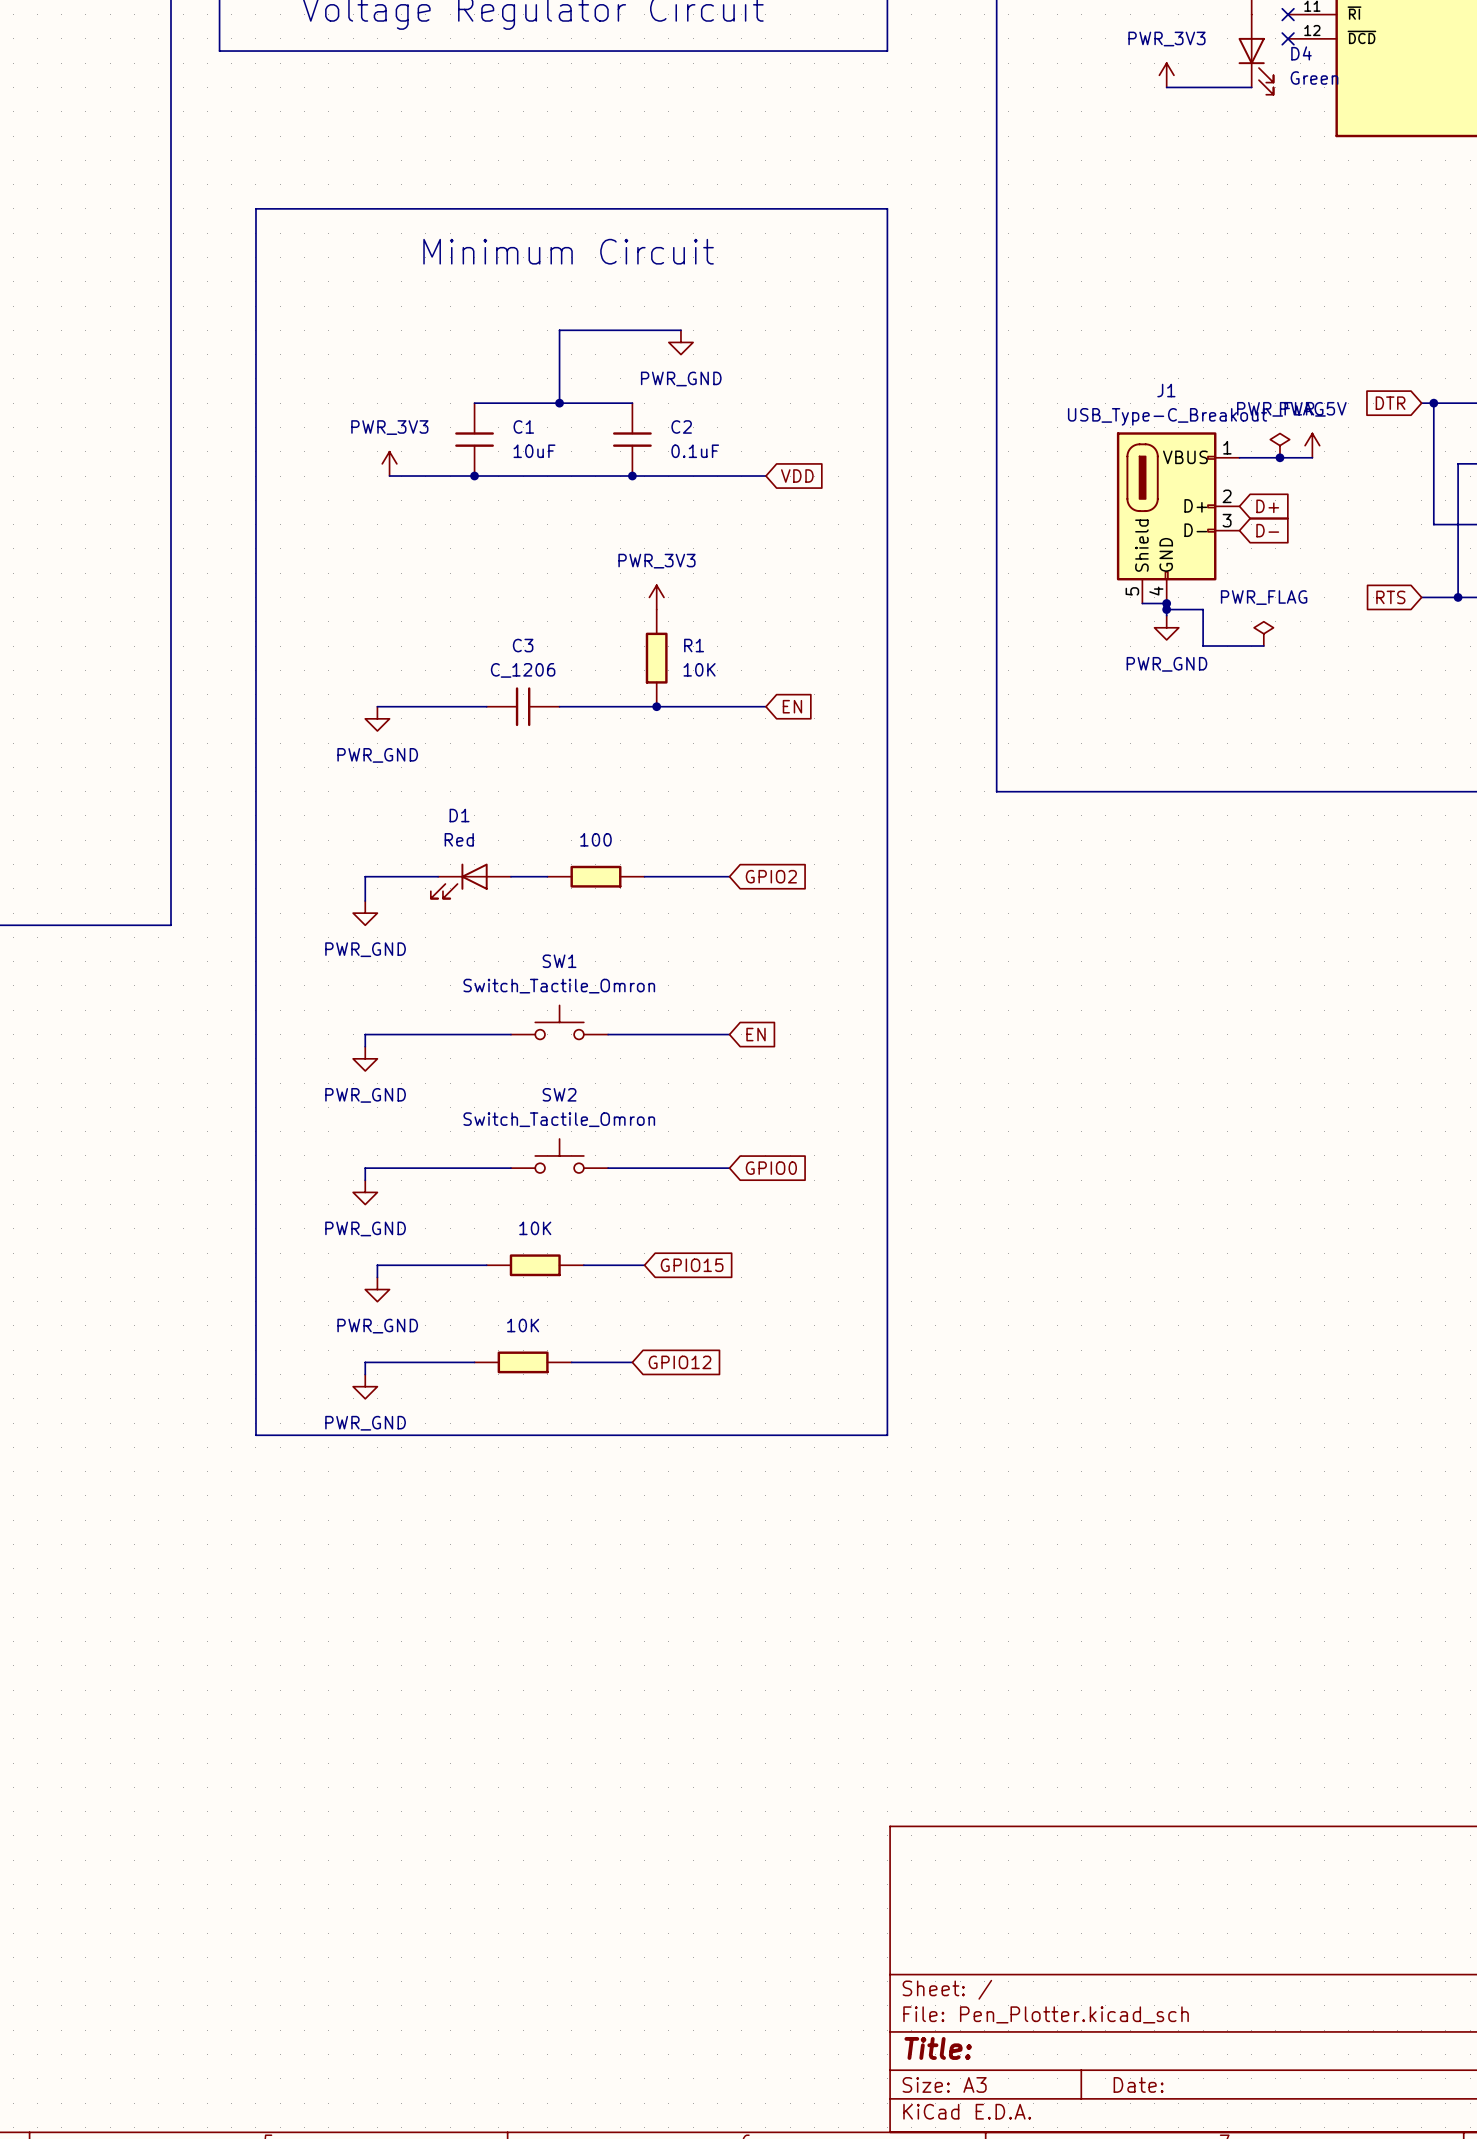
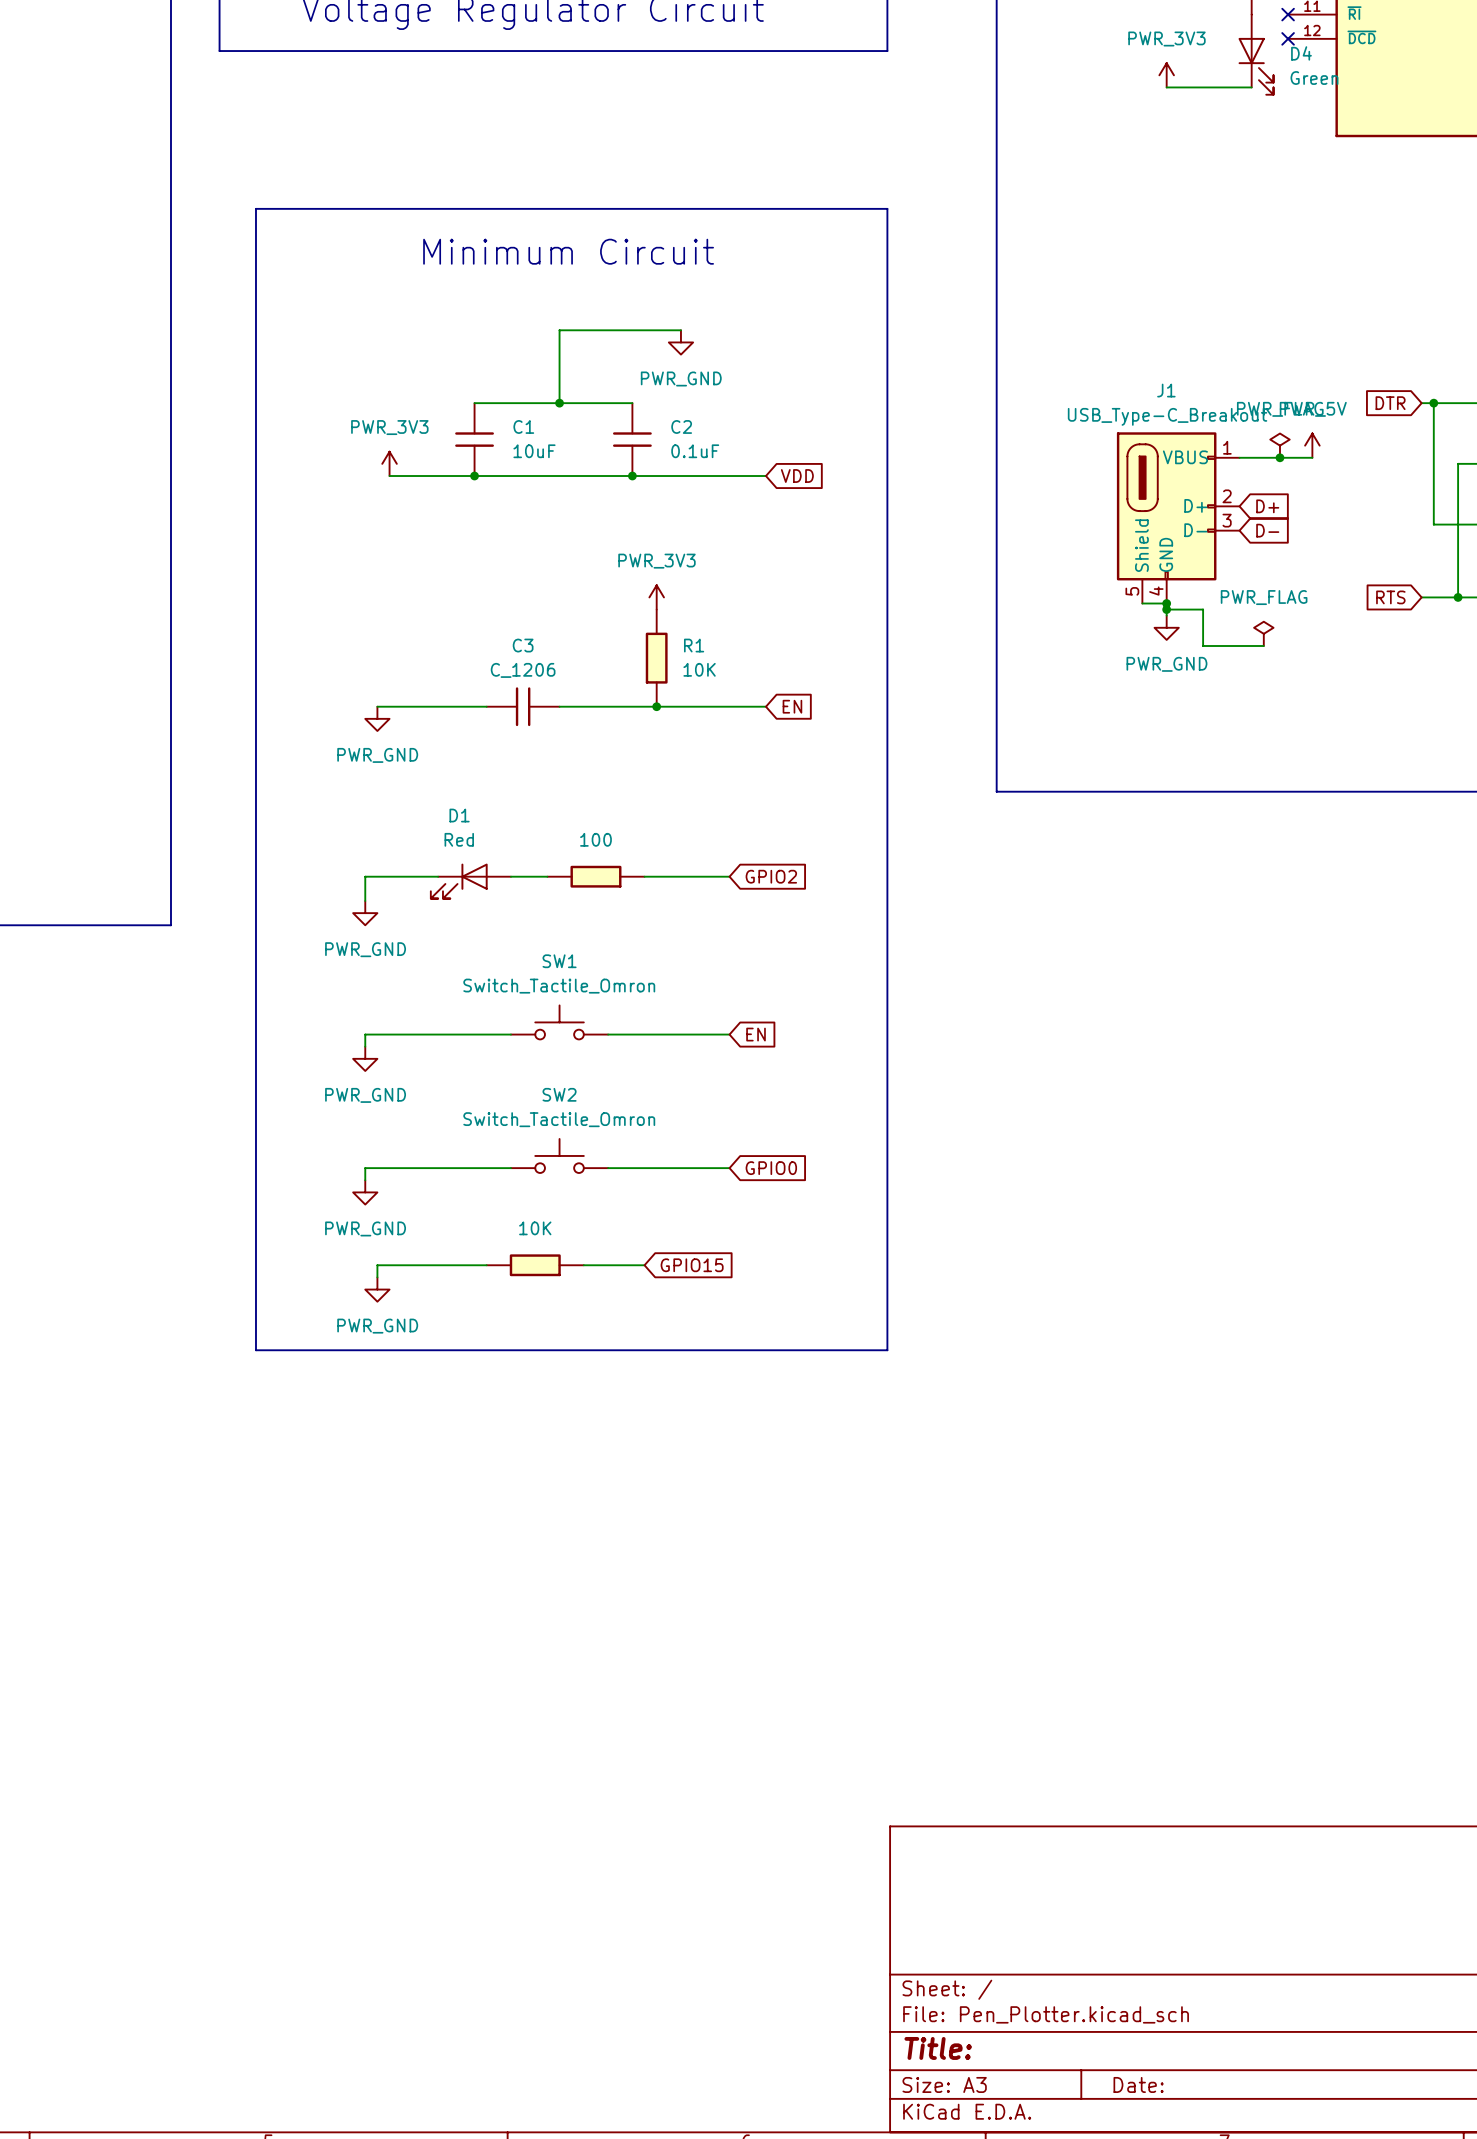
line: (255, 1350) (255, 1435) (887, 1435) (887, 1350) -> (255, 1350) (887, 1350)
wire: (474, 1362) (365, 1362) (365, 1374) -> none
part: 10K (523, 1362) -> none
wire: (571, 1362) (632, 1362) -> none
global label: GPIO12 (679, 1362) -> none
power symbol: PWR_GND (365, 1386) -> none

